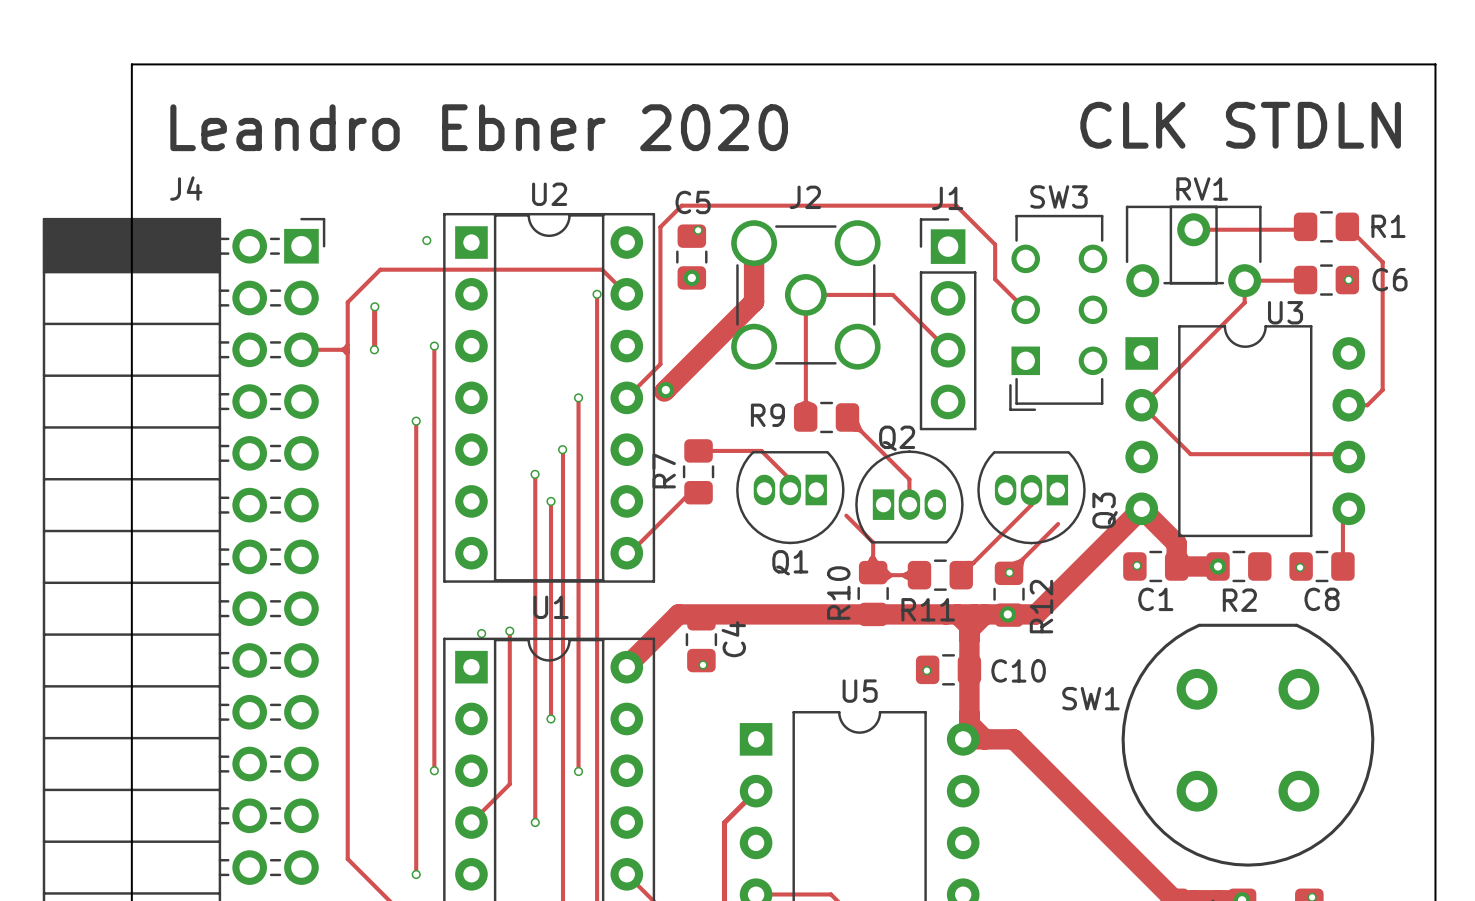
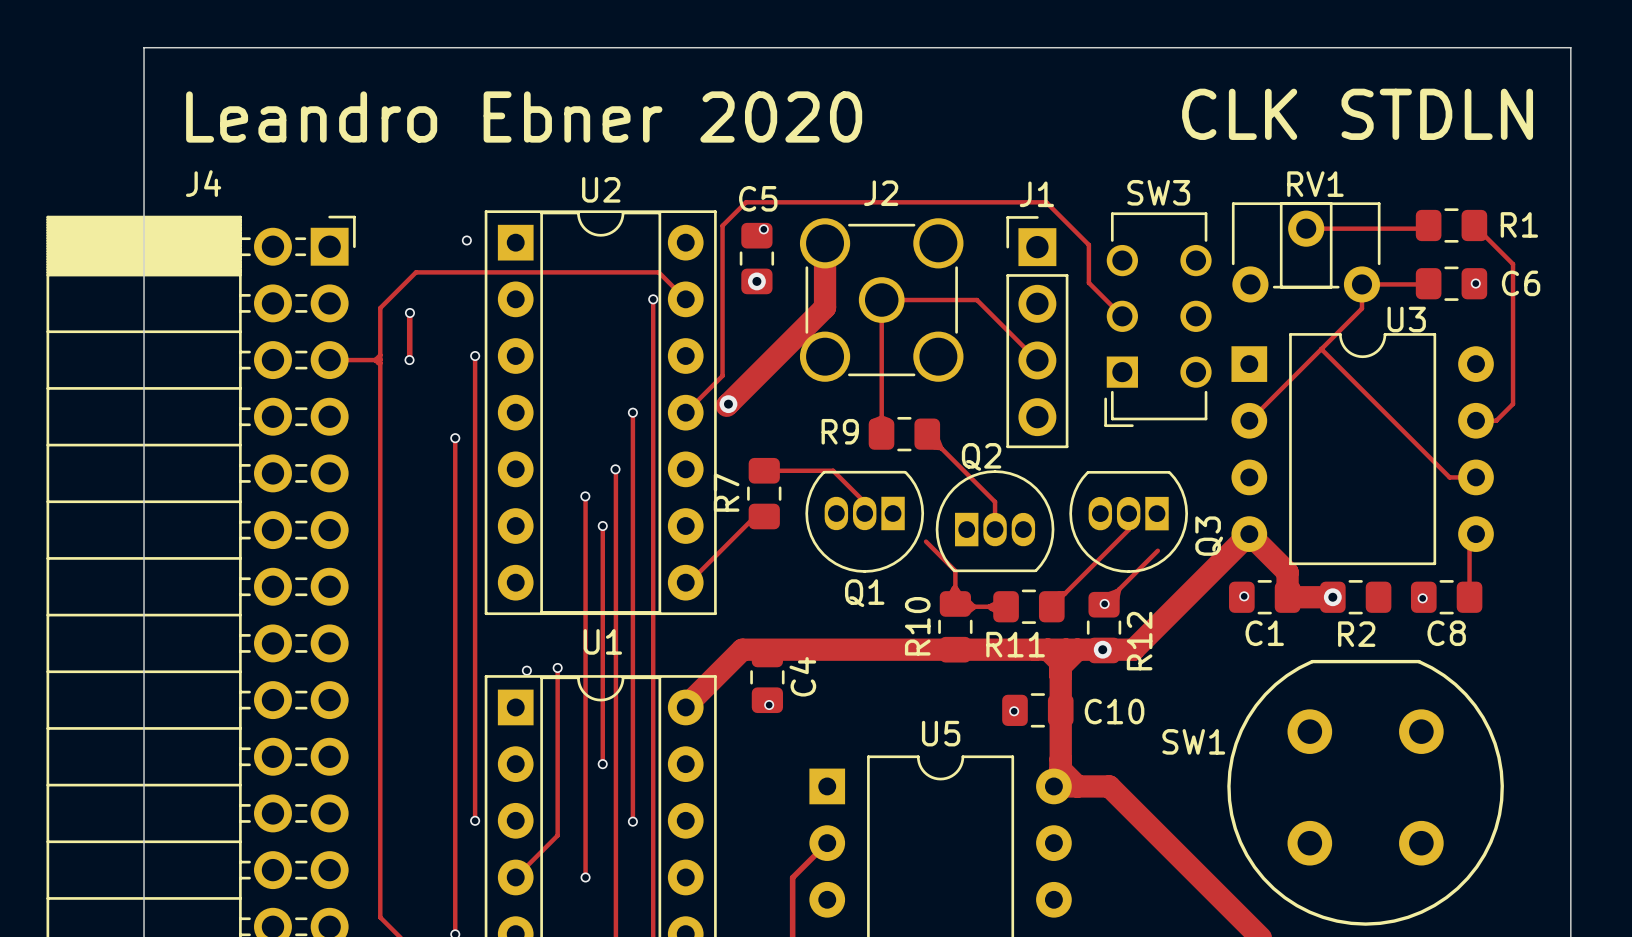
track: none -> (1321, 348) (1449, 477) (1476, 477)
track: (1141, 405) (1190, 454) (1345, 454) -> none

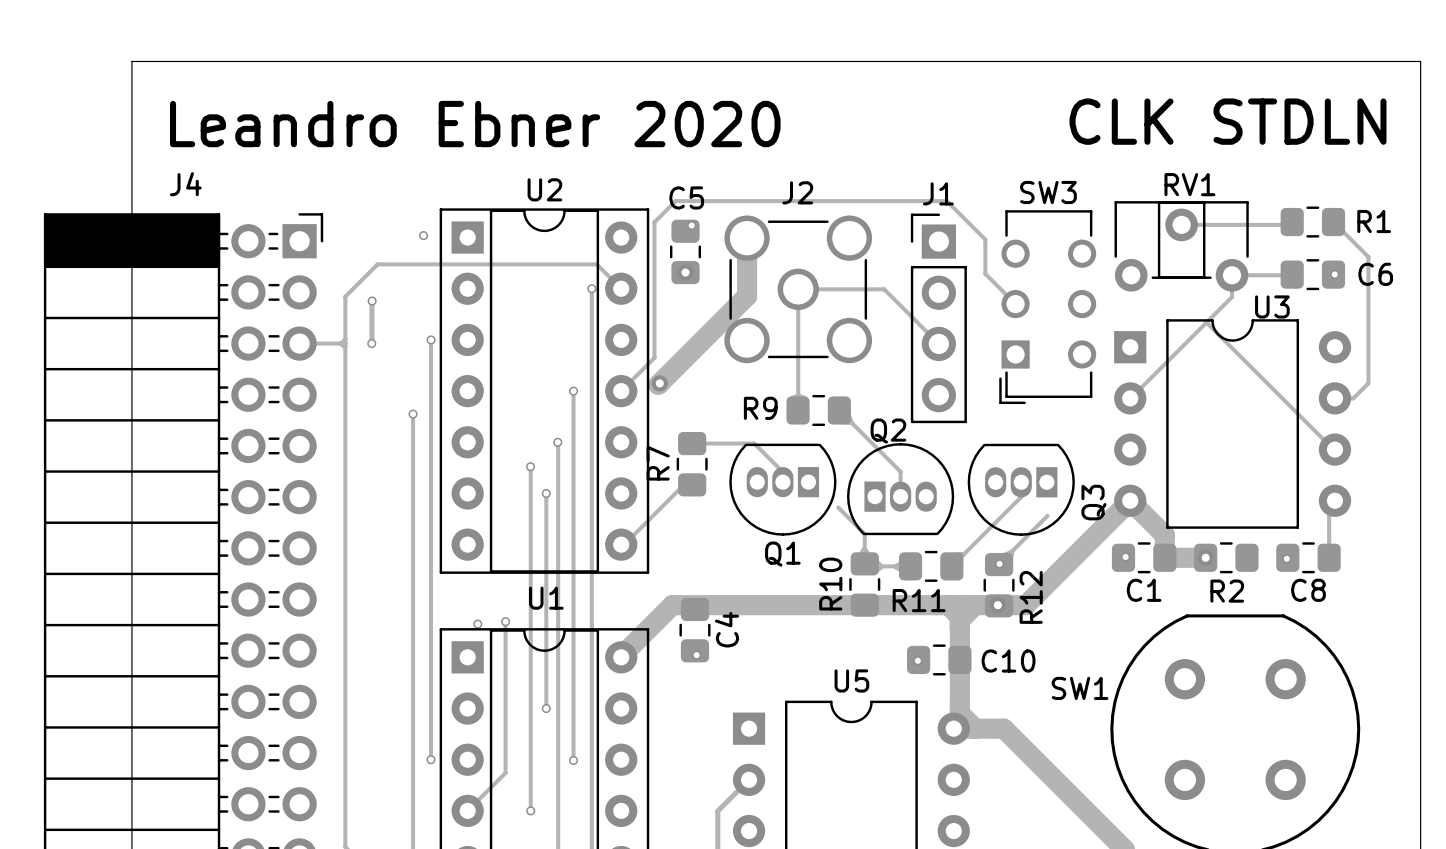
track: (1321, 348) (1449, 477) (1474, 477) -> (1206, 322) (1333, 449)

